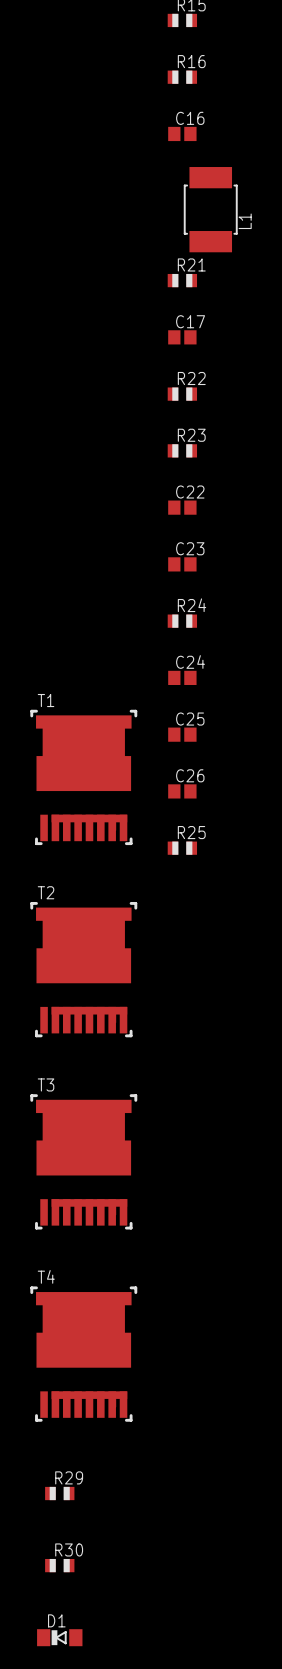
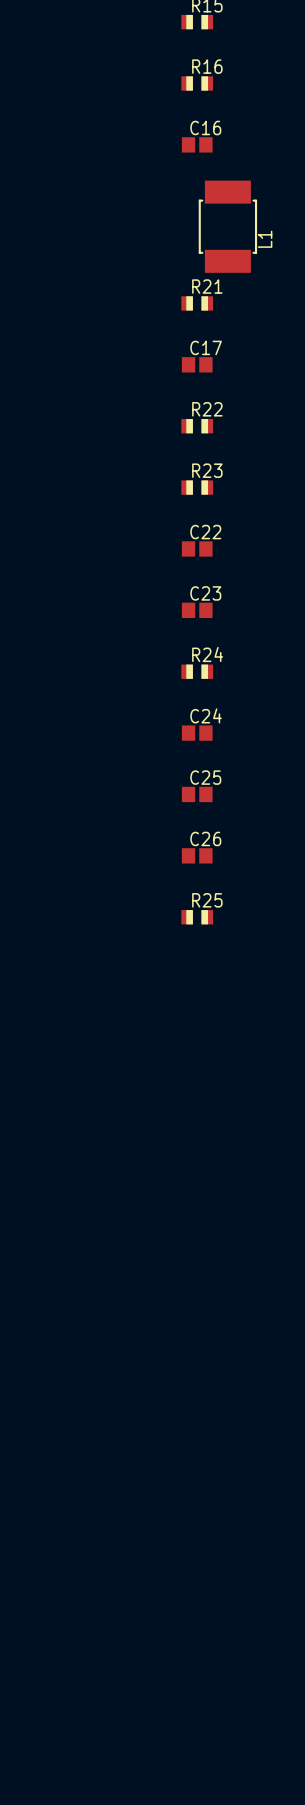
T1: (80, 780) -> none
T2: (80, 973) -> none
T3: (80, 1165) -> none
T4: (80, 1357) -> none
R29: (59, 1493) -> none
R30: (59, 1565) -> none
D1: (59, 1637) -> none

